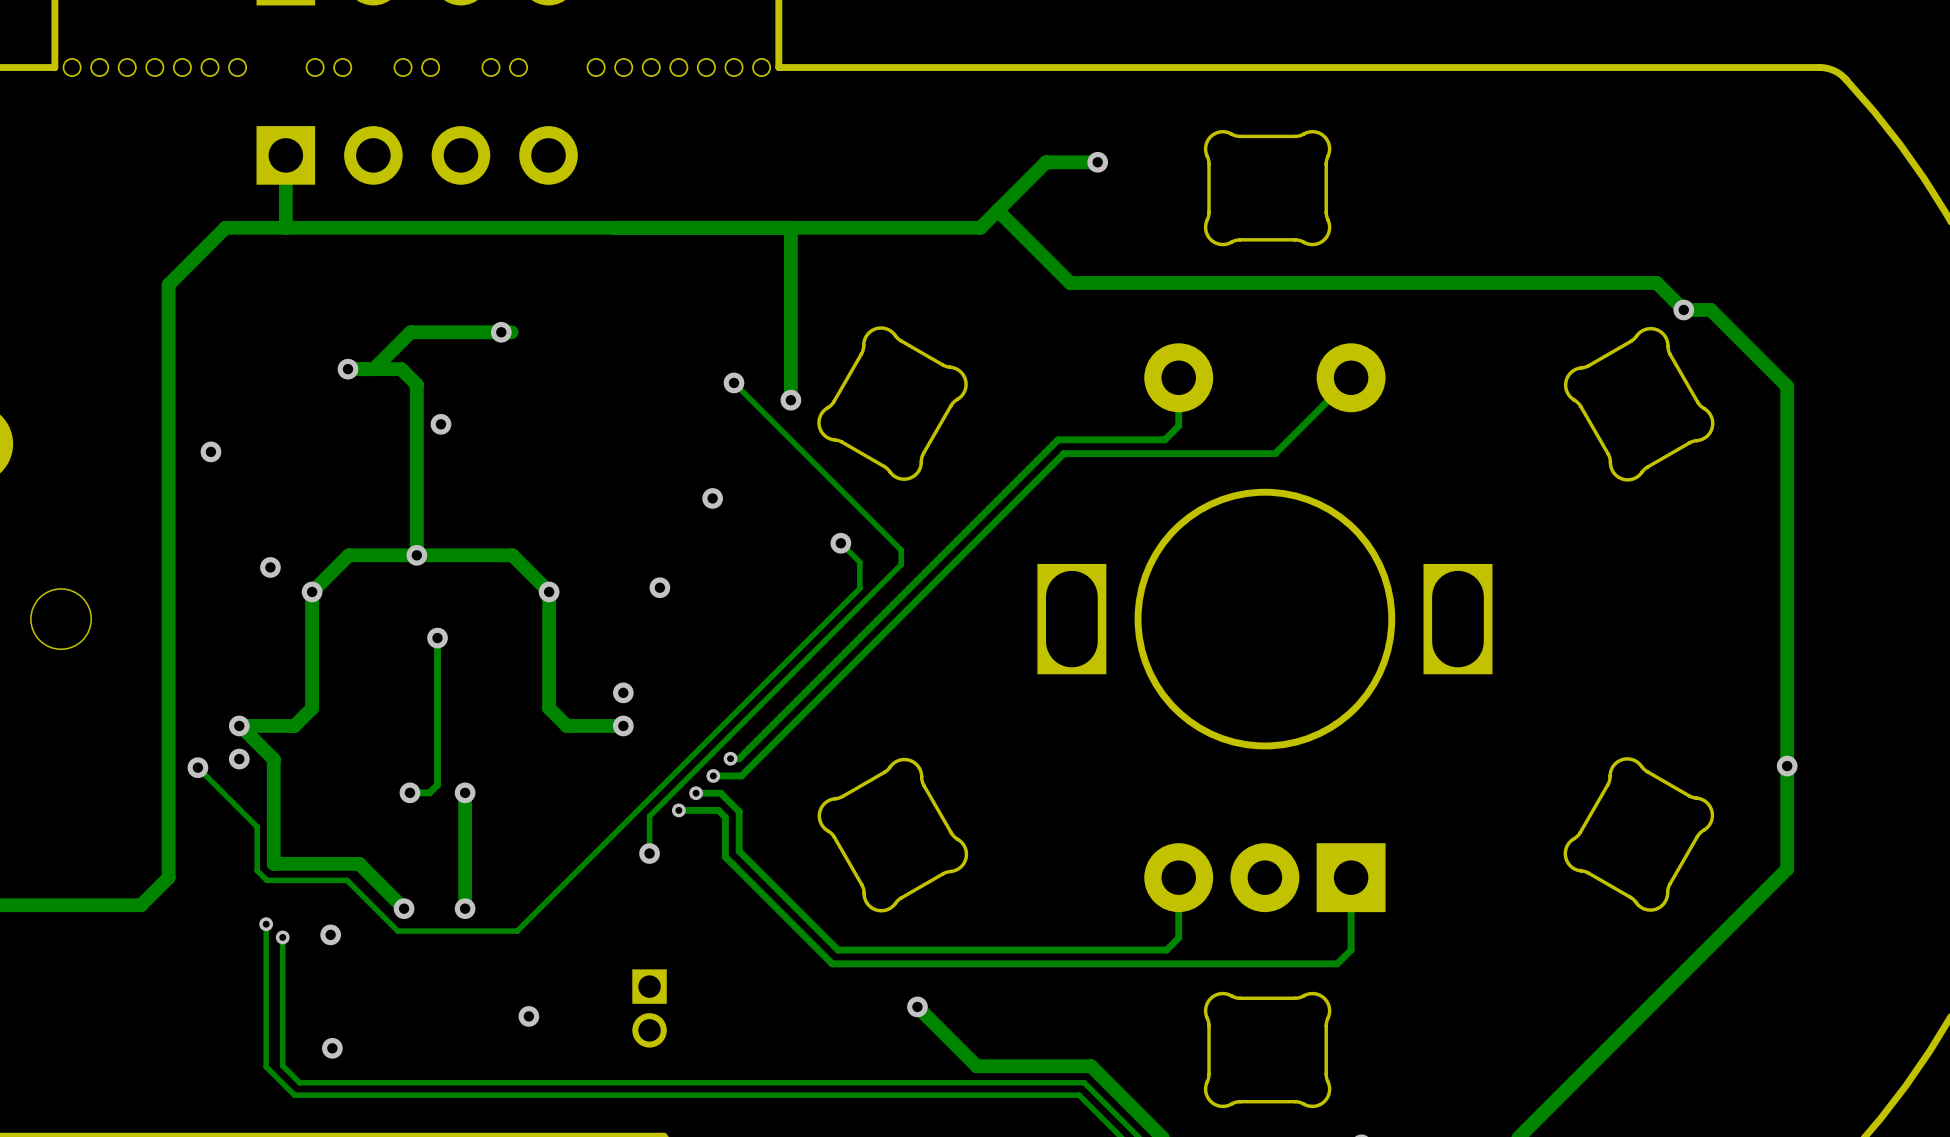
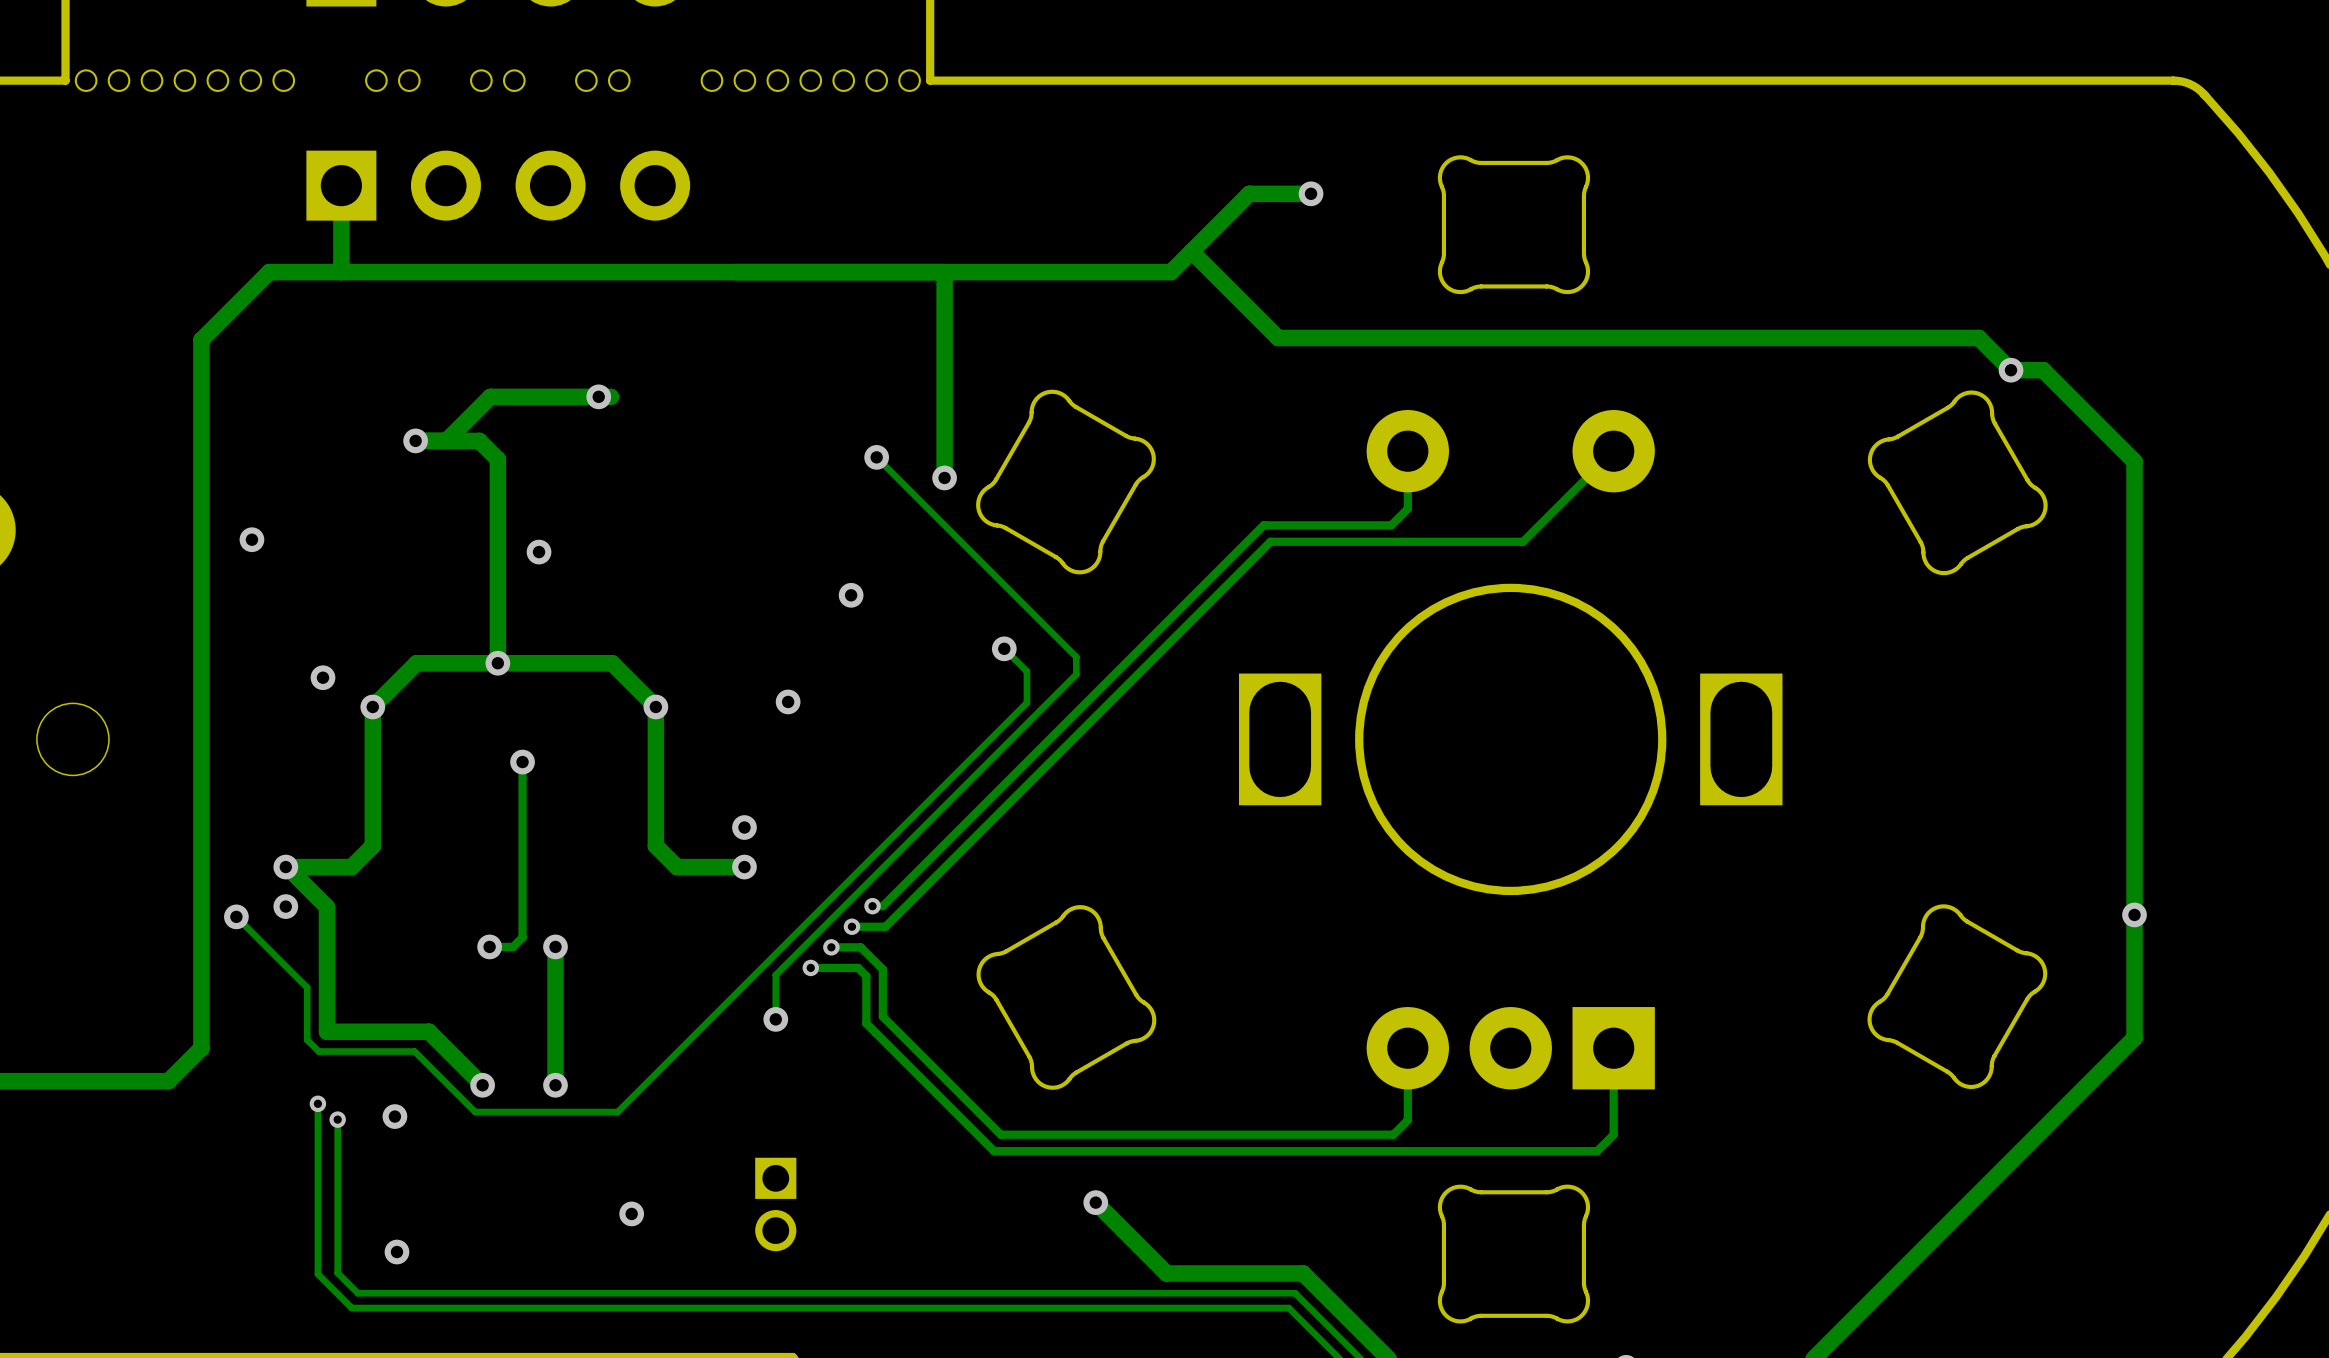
via position: (440, 424) -> (539, 552)

